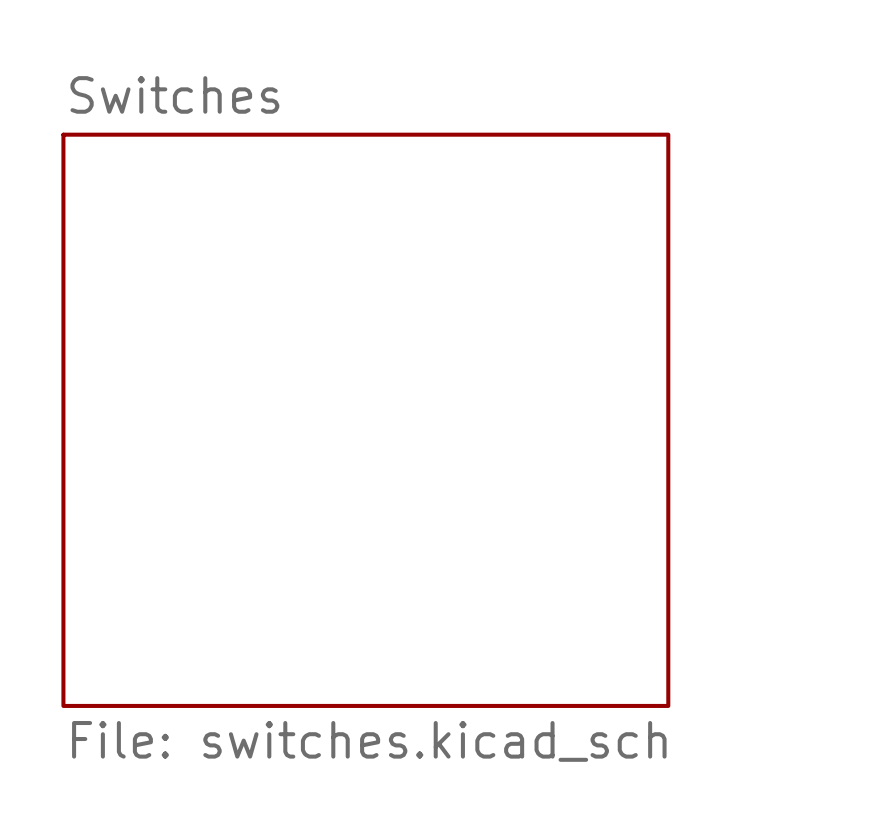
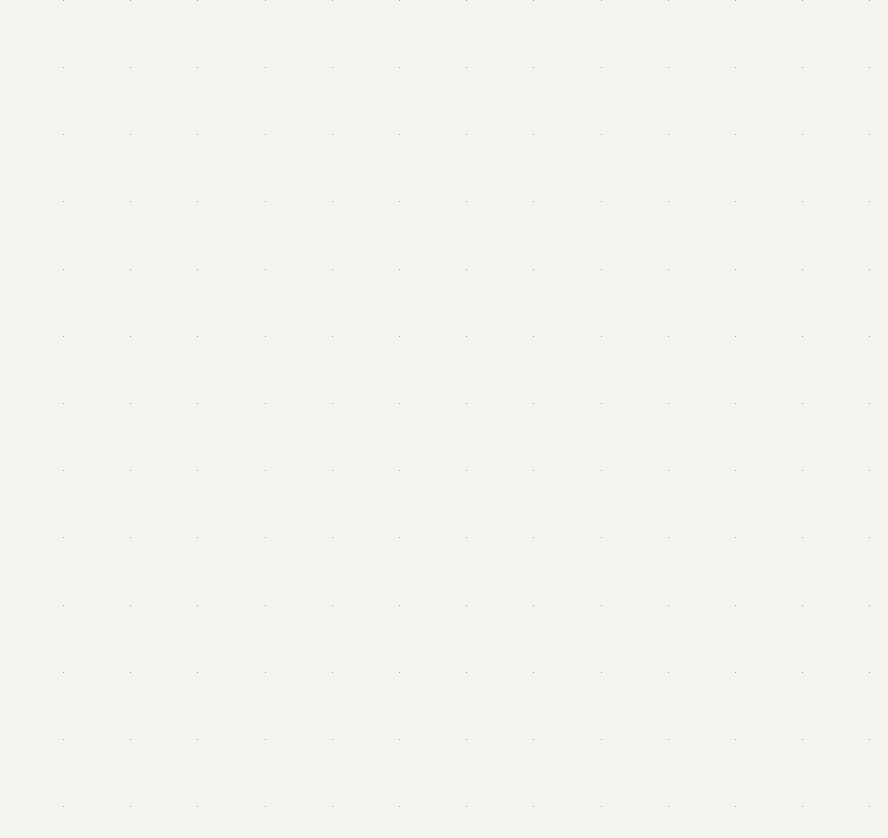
sheet Switches: File: switches.kicad_sch (365, 420) -> none

